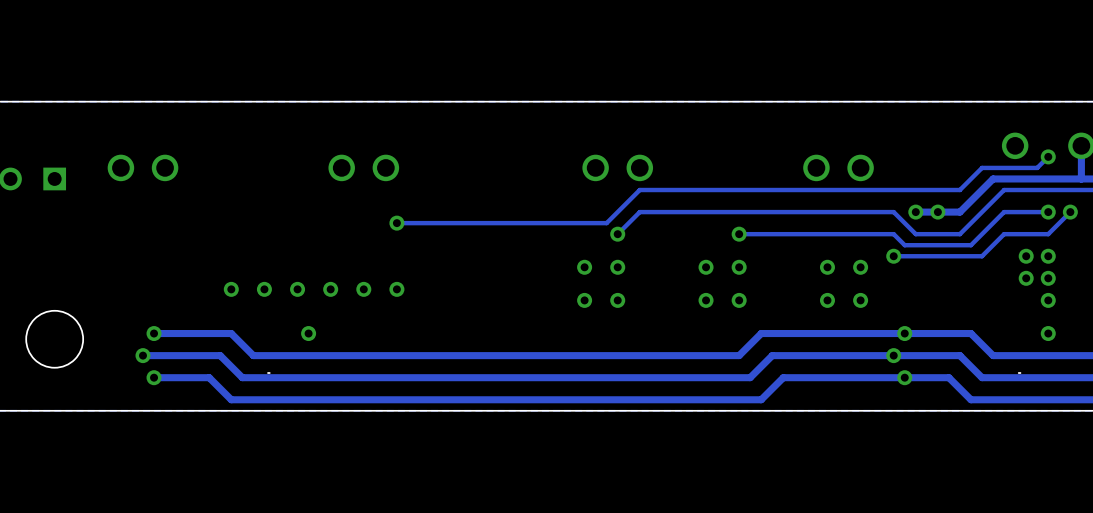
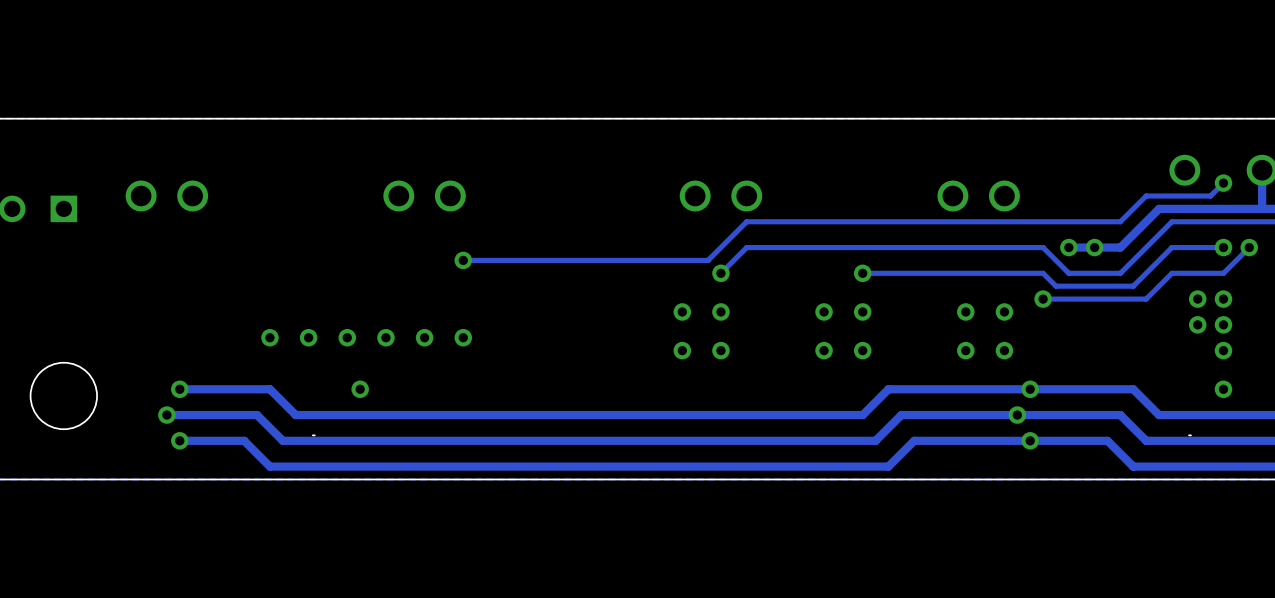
via: none -> (1030, 389)
via: (904, 333) -> none
via: none -> (1017, 415)
via: (893, 355) -> none
via: none -> (1030, 440)
via: (904, 377) -> none

